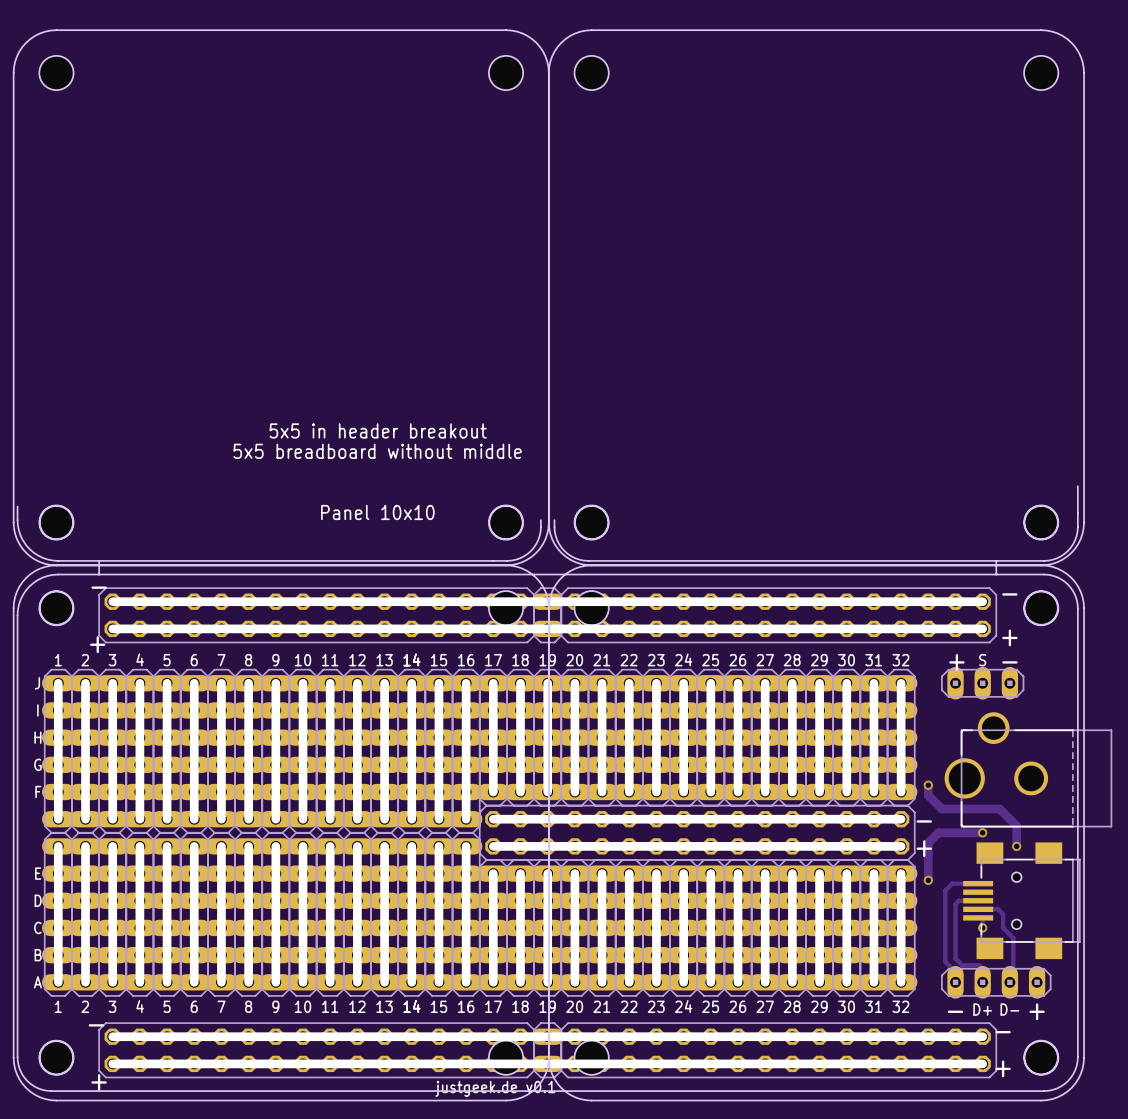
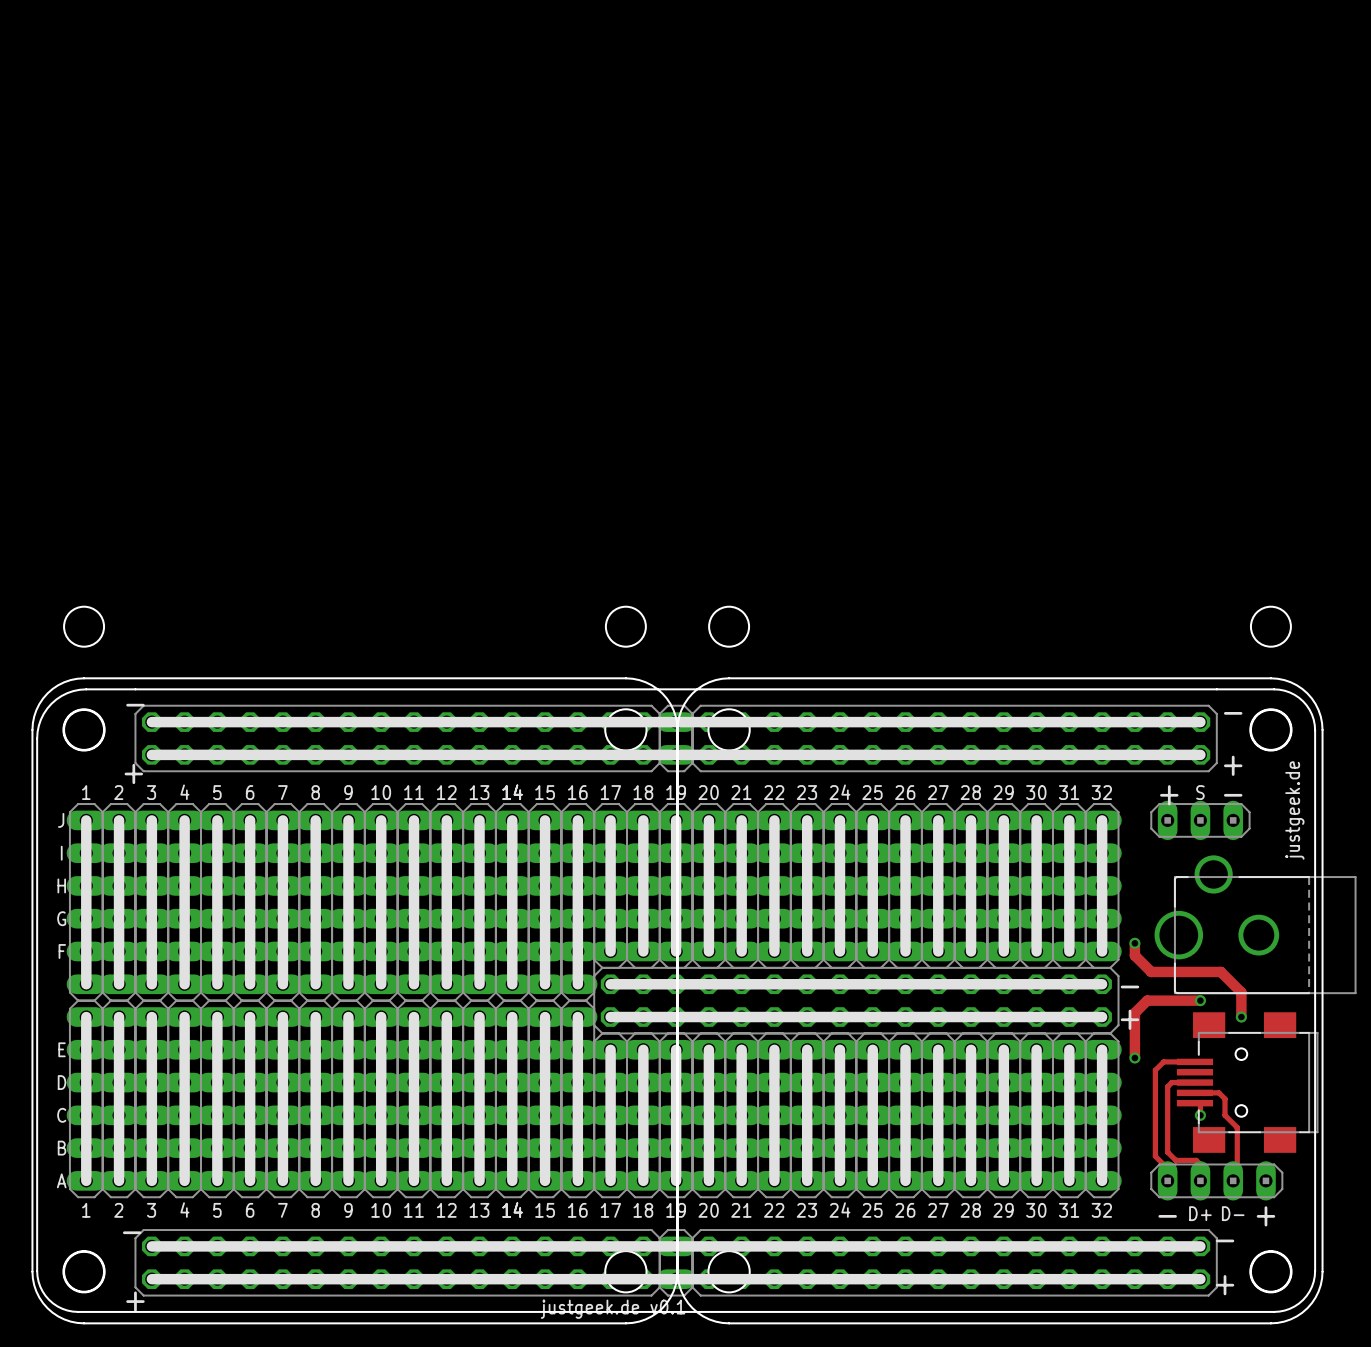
part: (281, 297) -> none
part: (816, 297) -> none
text: 5x5 in header breakout (378, 430) -> none
text: 5x5 breadboard without middle (377, 451) -> none
board edge: (1077, 486) (1077, 526) (1075, 539) (1064, 553) (1052, 559) (1043, 560) (584, 560) (571, 556) (561, 547) (555, 535) (554, 520) -> none
board edge: (17, 506) (18, 530) (25, 544) (37, 555) (58, 560) (511, 560) (523, 556) (533, 547) (539, 535) (540, 520) -> none
text: Panel 10x10 (377, 512) -> none
board edge: (99, 560) (99, 574) -> none
board edge: (996, 560) (996, 574) -> none
text: none -> justgeek.de (1294, 810)

